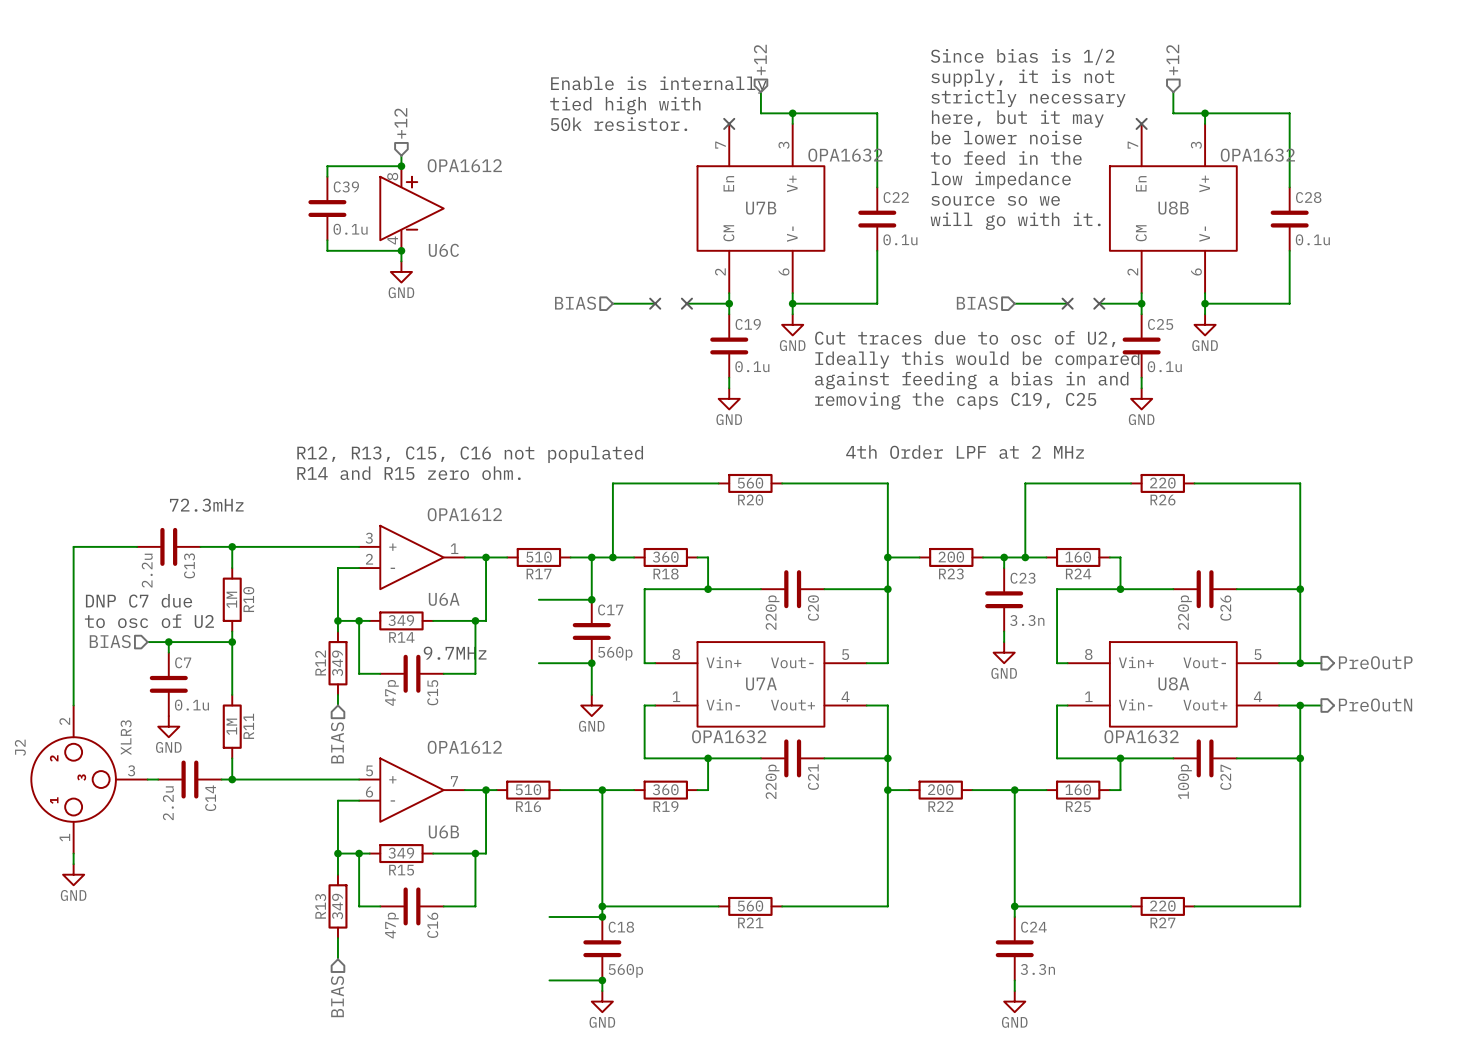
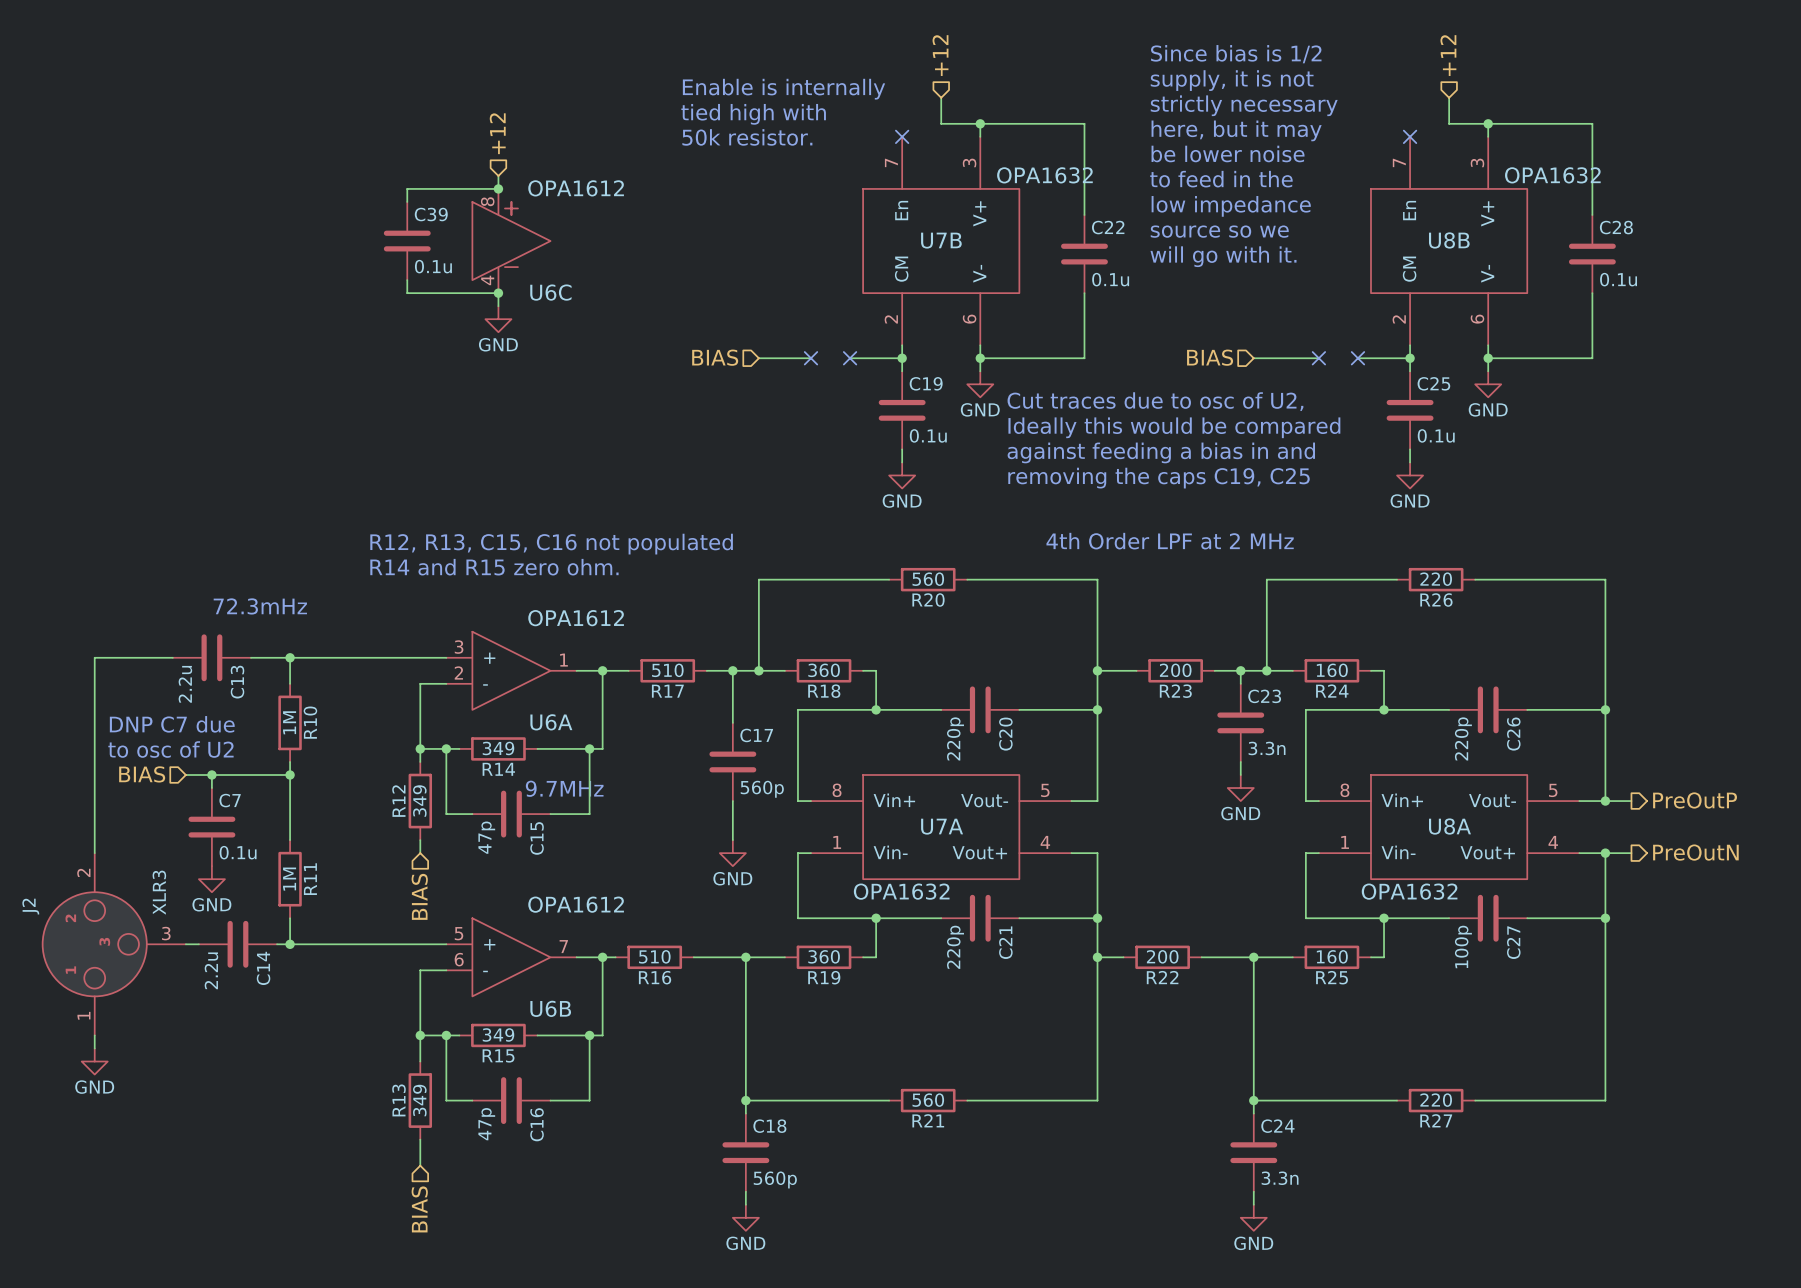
wire: (538, 599) (591, 599) -> none
junction: (591, 599) -> none
wire: (538, 663) (591, 663) -> none
junction: (591, 663) -> none
wire: (549, 916) (602, 916) -> none
junction: (602, 916) -> none
wire: (549, 980) (602, 980) -> none
junction: (602, 980) -> none

